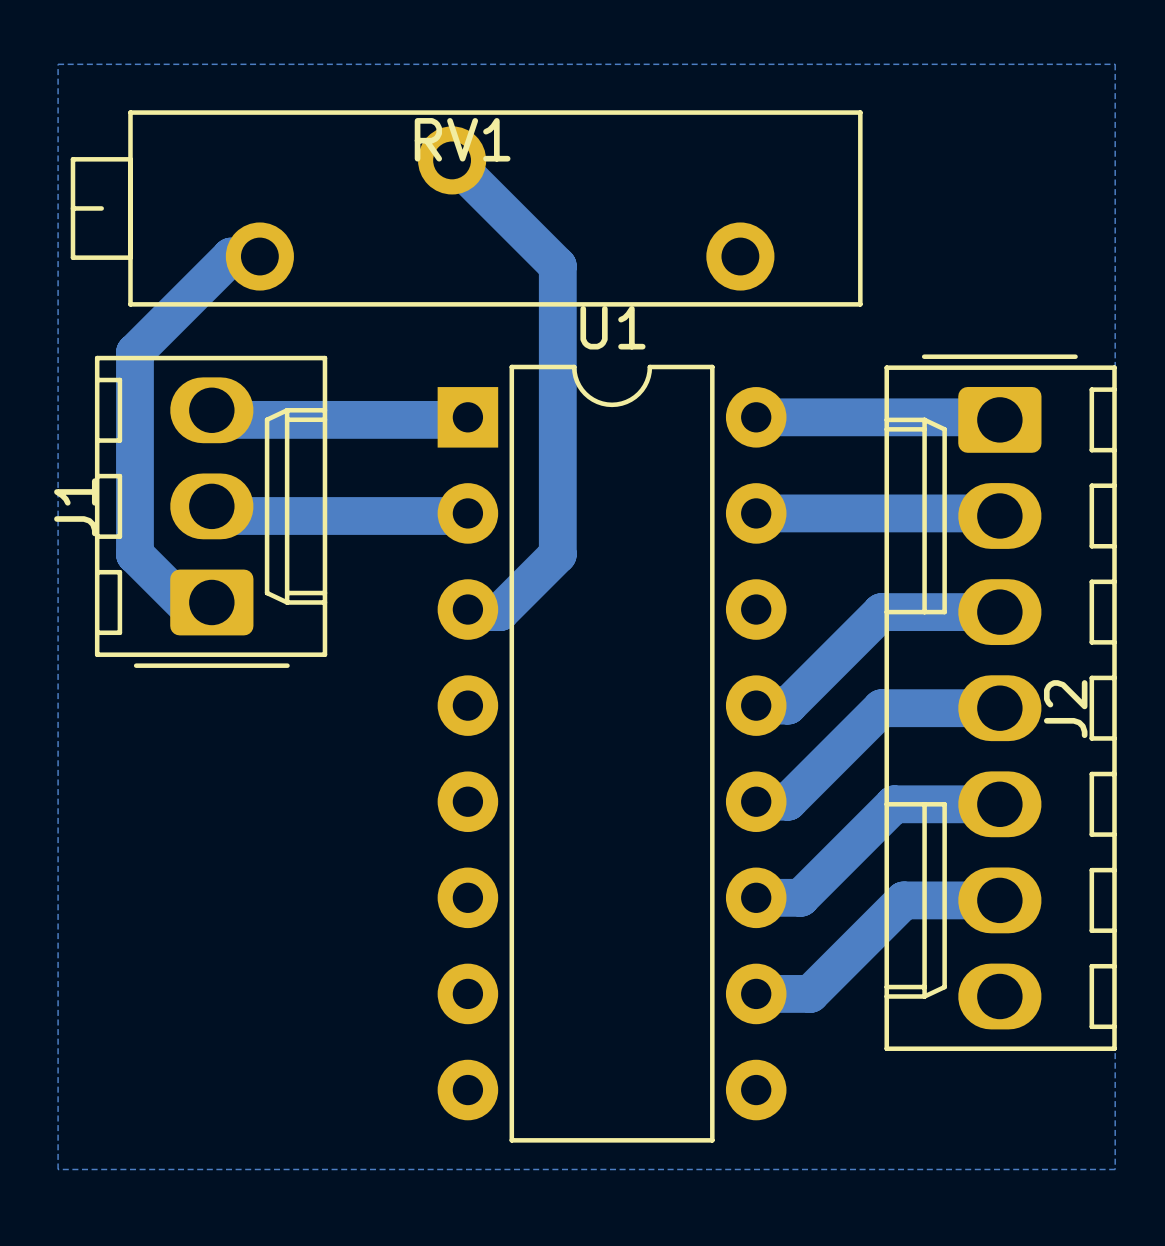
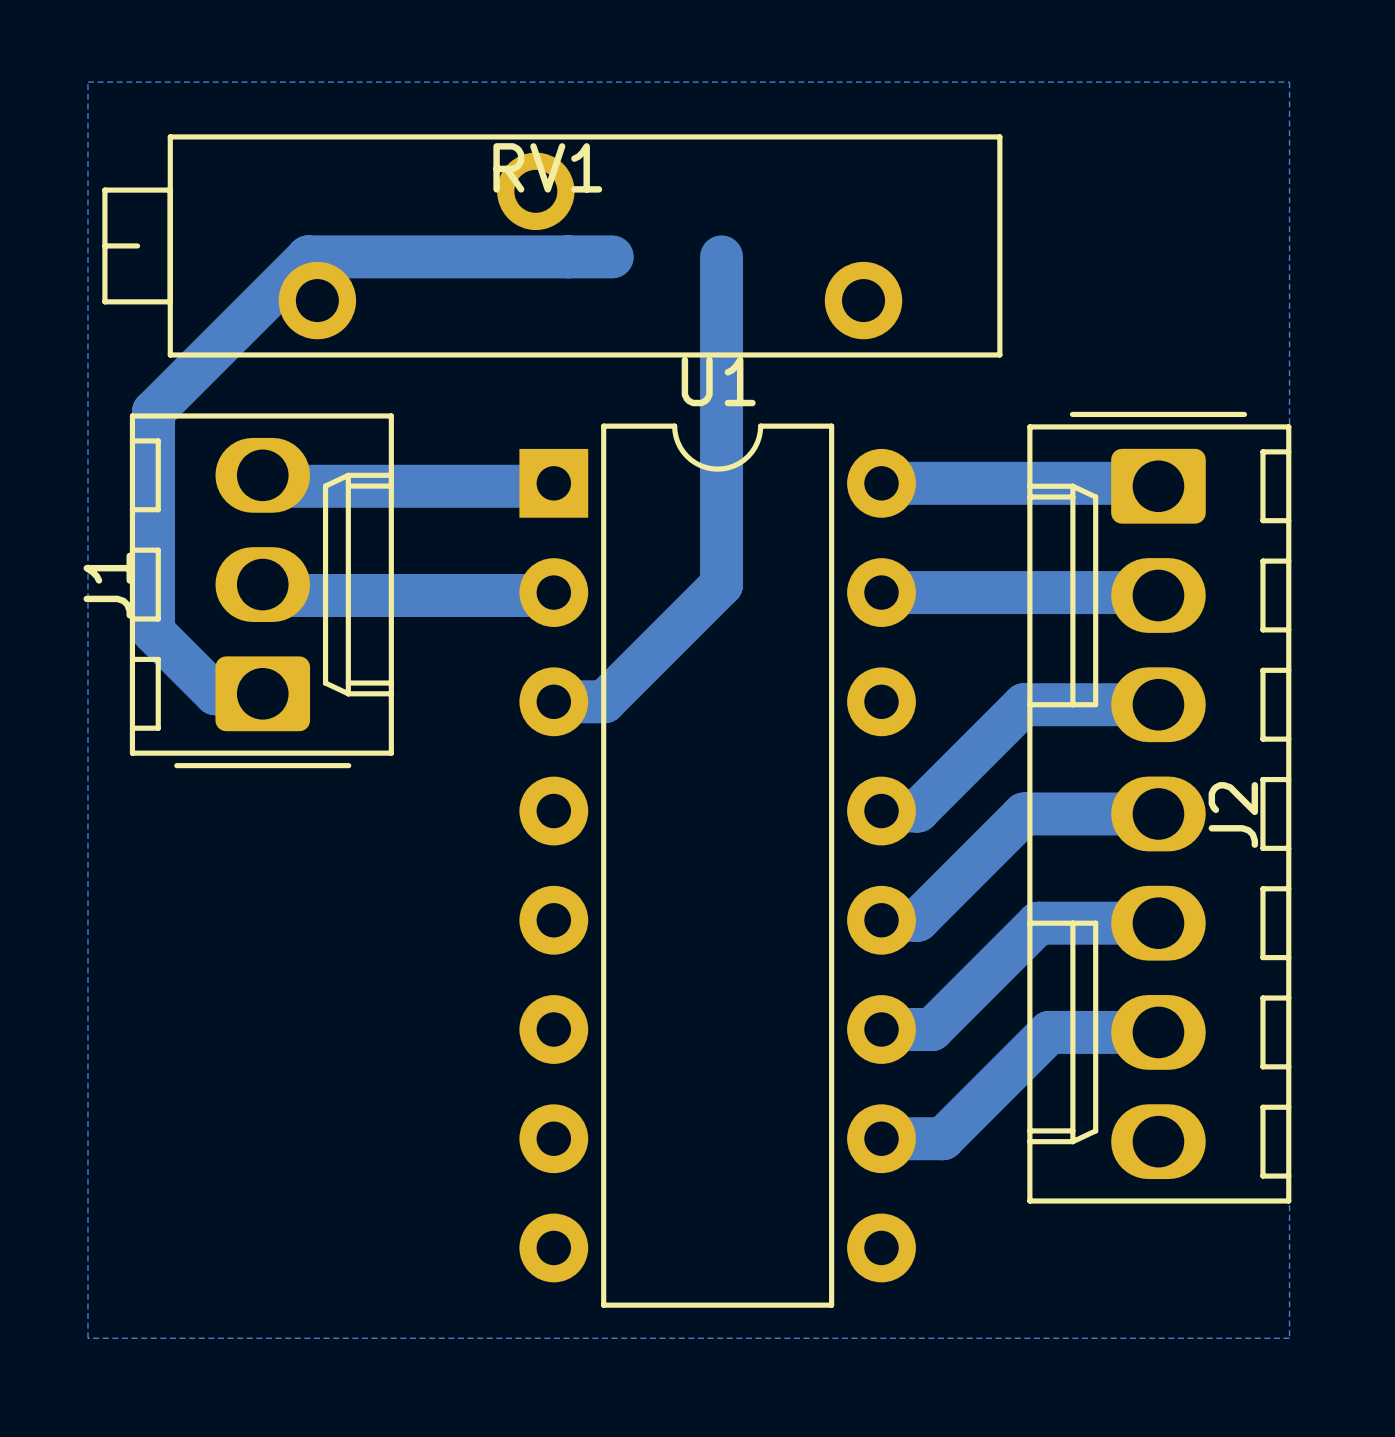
bottom track: (452, 160) (557, 266) (557, 554) (500, 612) (470, 612) (467, 609) -> (721, 256) (721, 584) (604, 701) (553, 701)
bottom track: none -> (612, 256) (308, 256) (153, 411) (153, 631) (215, 693) (262, 693)
bottom track: (259, 256) (231, 256) (134, 352) (134, 554) (192, 612) (221, 612) -> none

